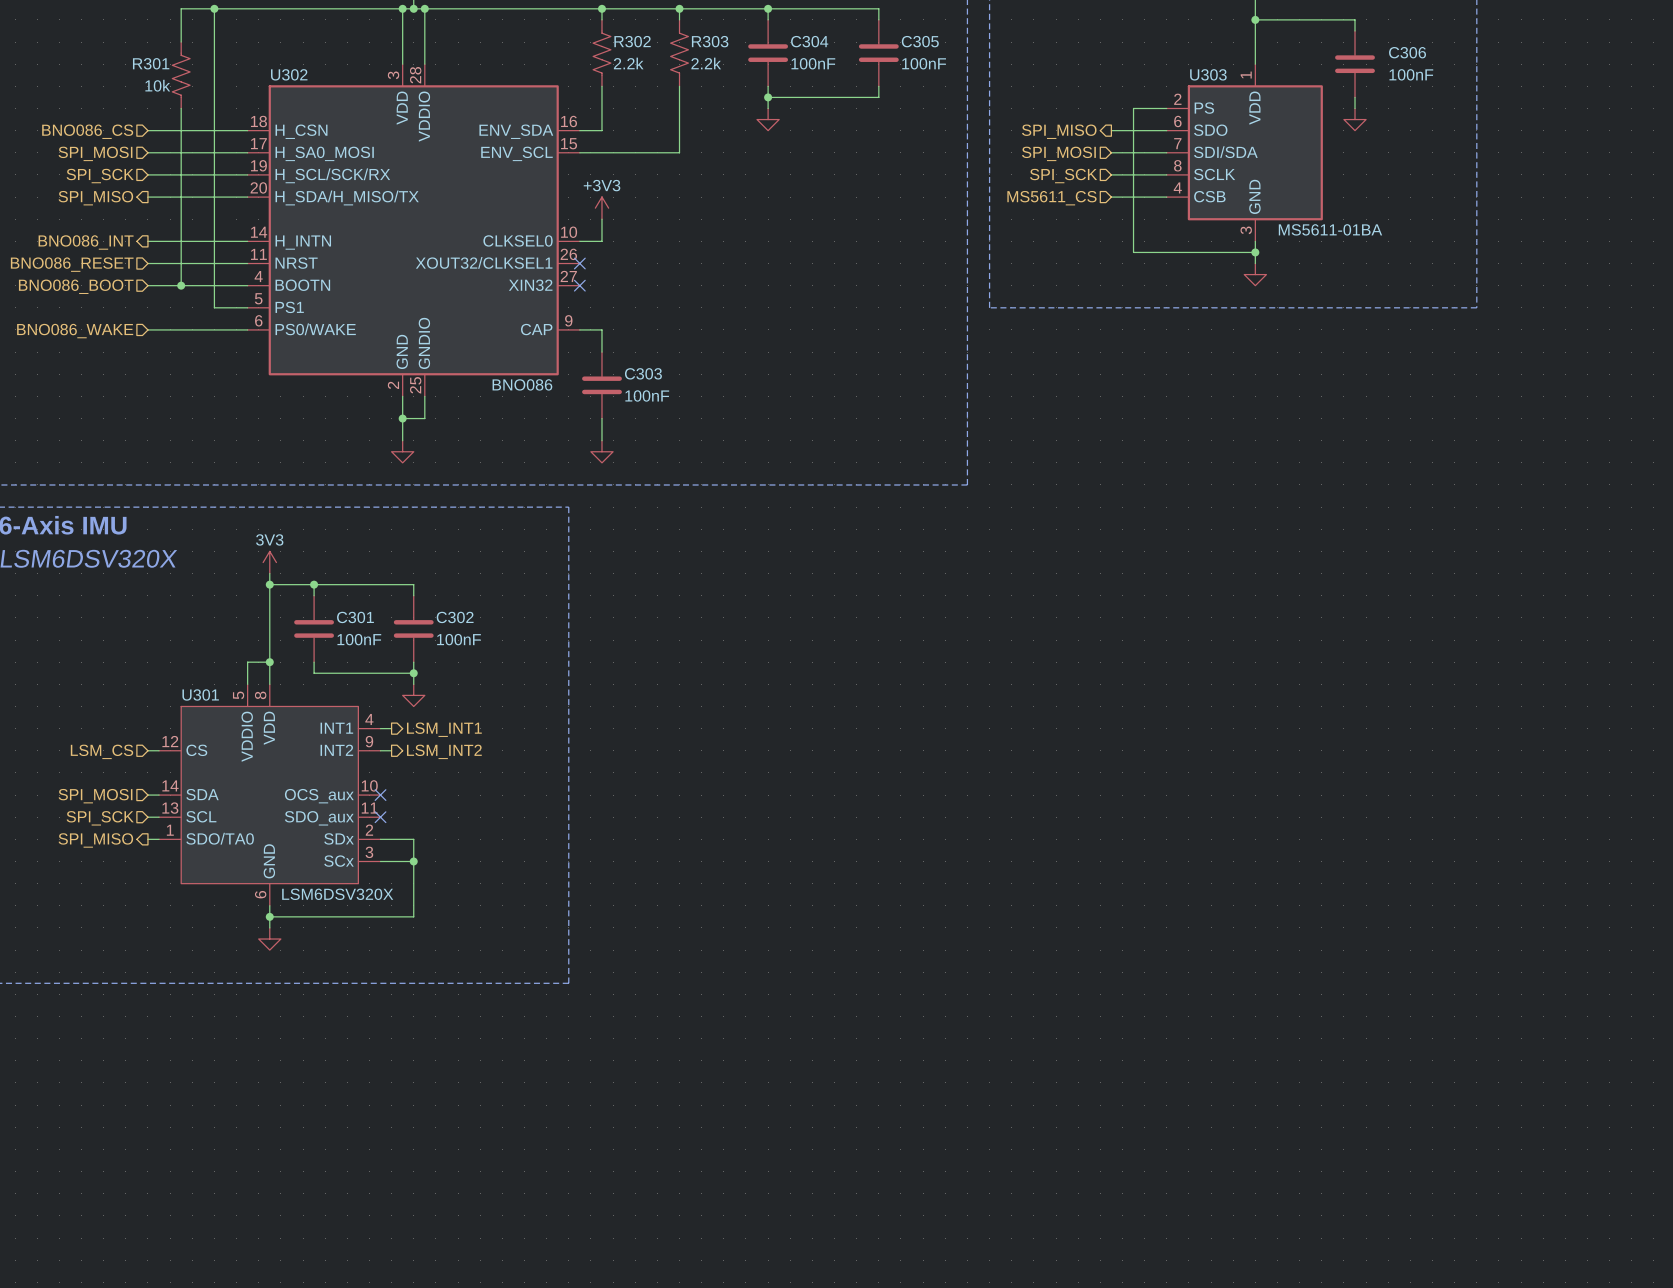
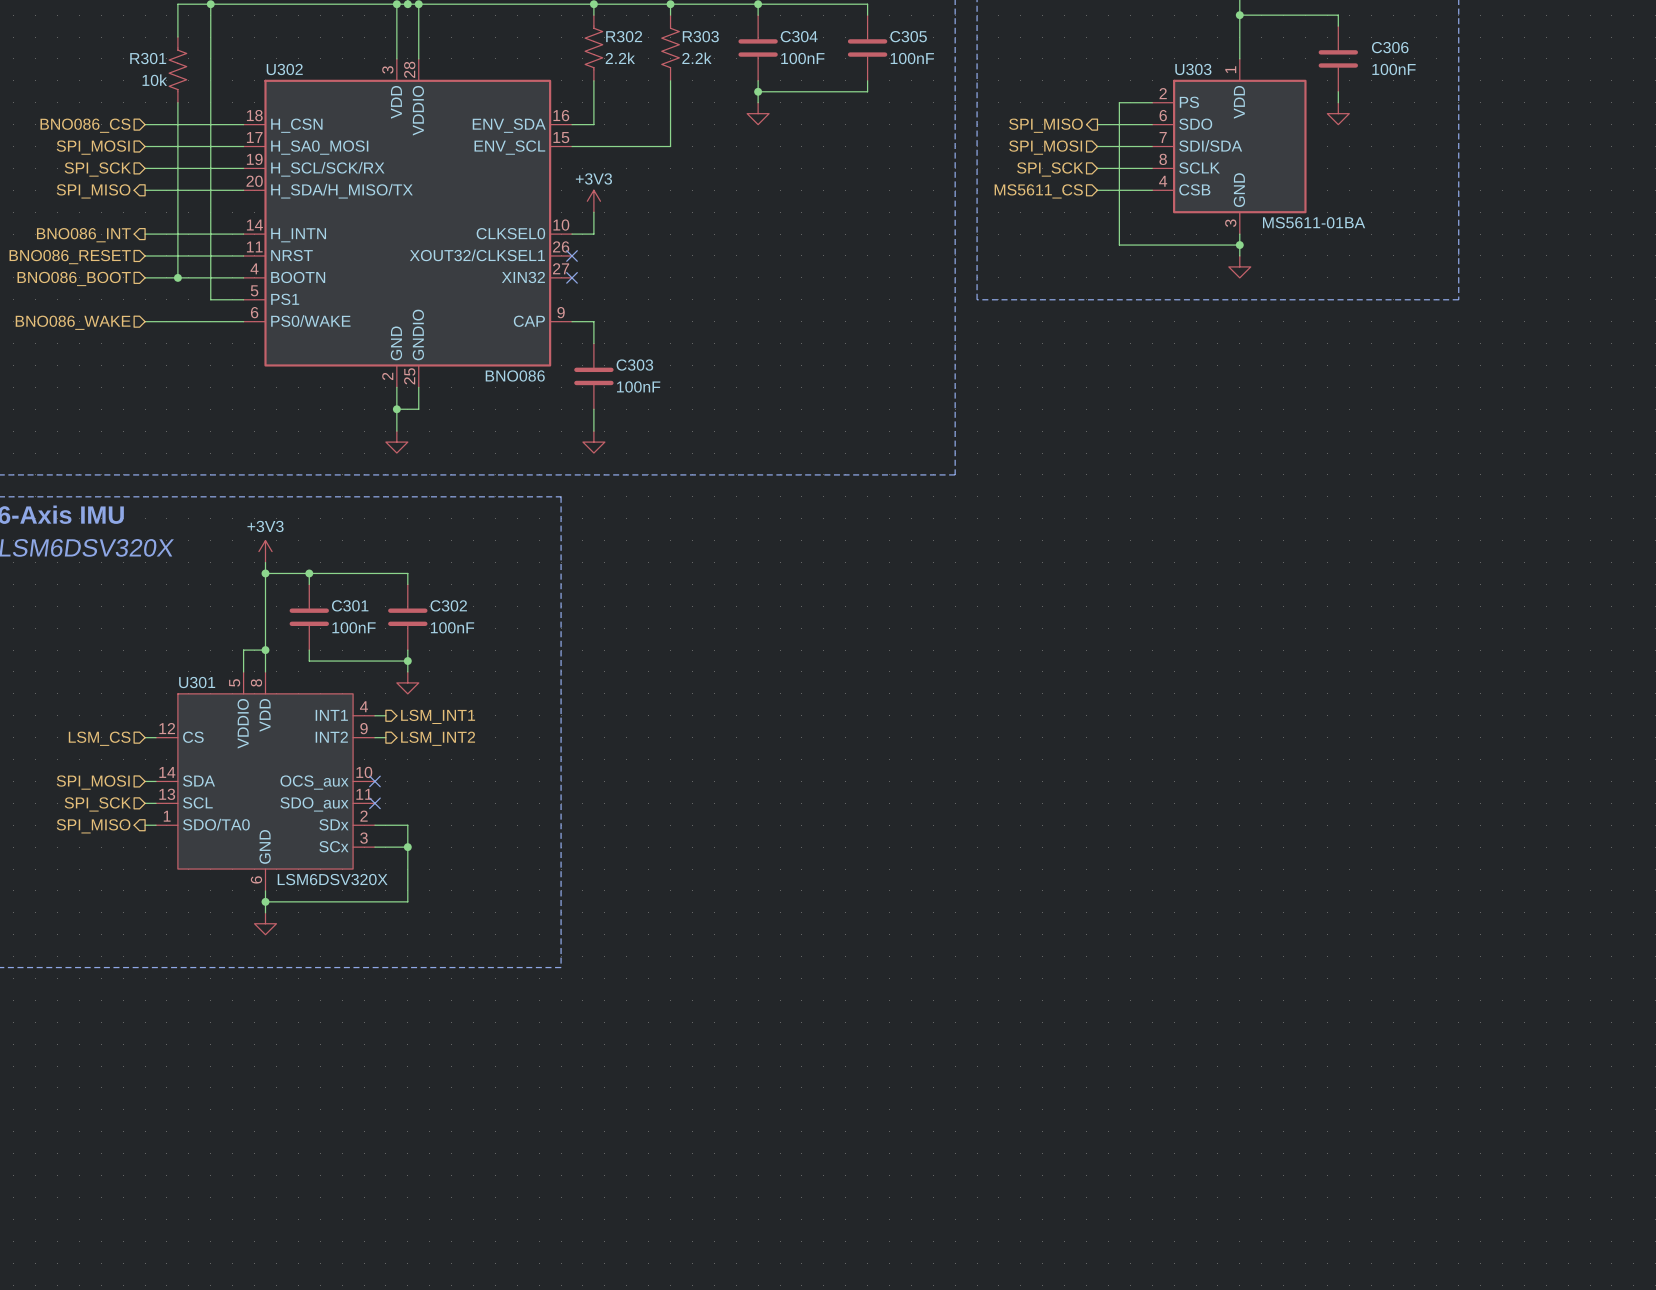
power symbol: 3V3 (269, 562) -> +3V3 (265, 551)

